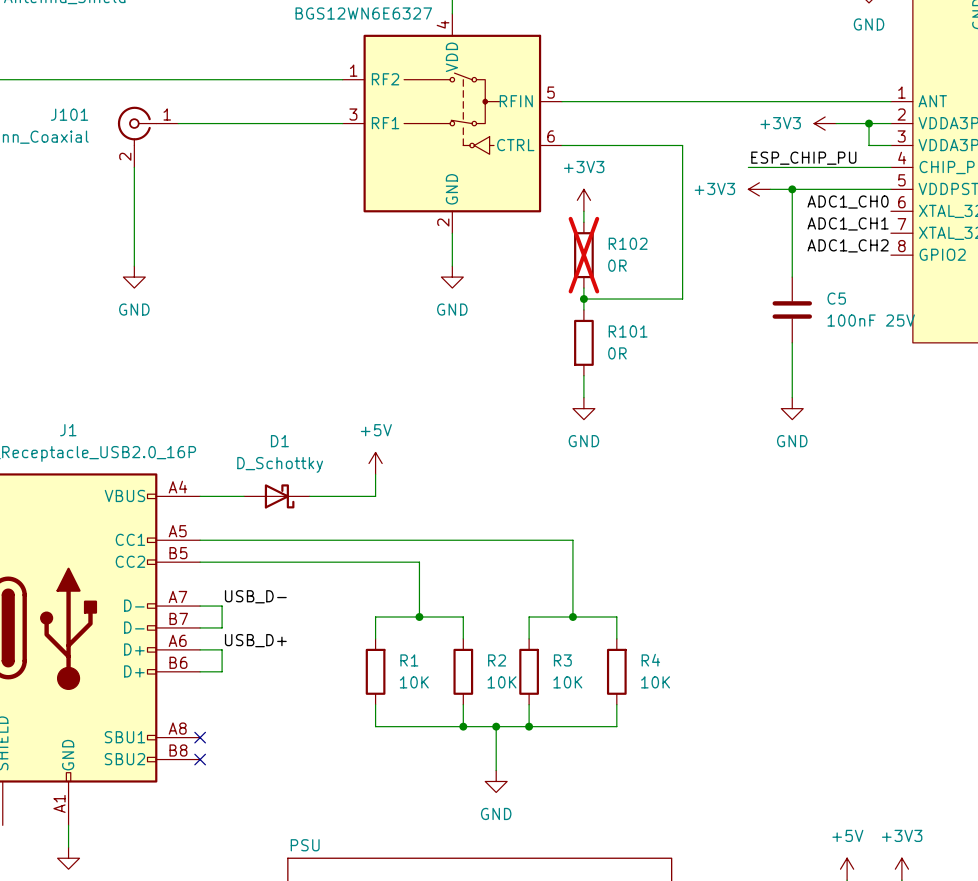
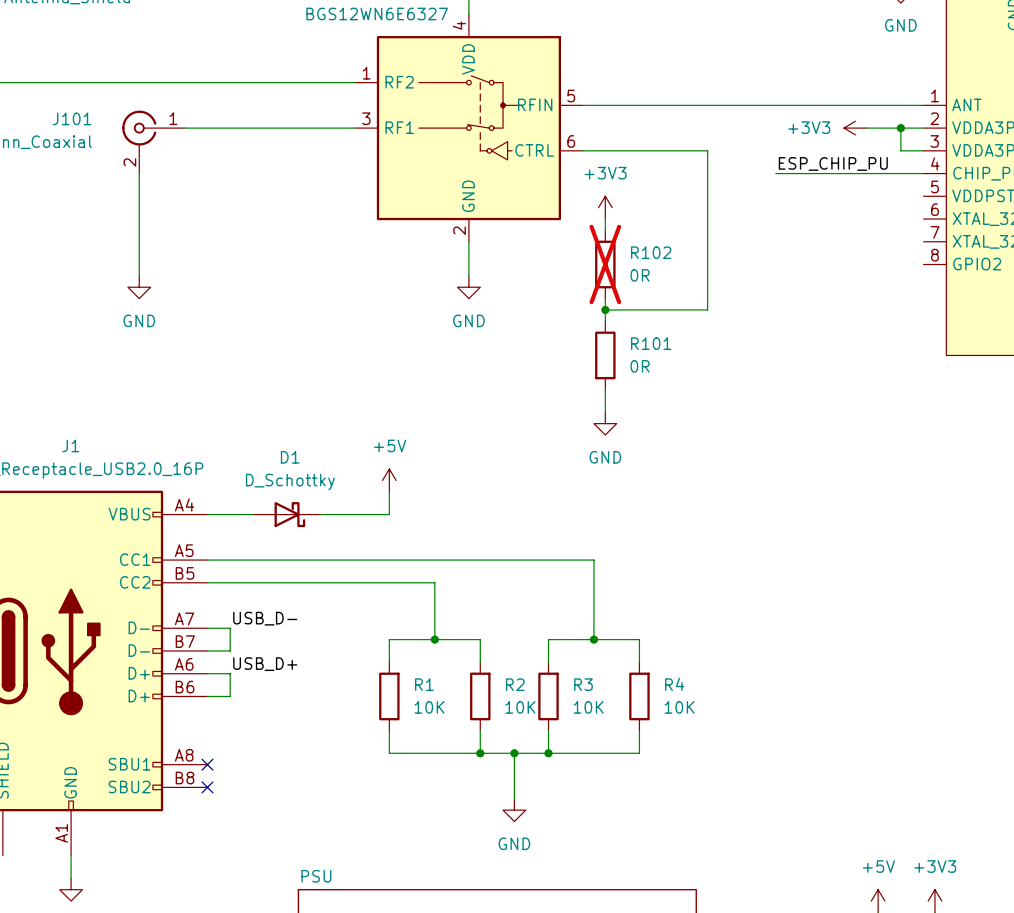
power symbol: +3V3 (759, 189) -> none
wire: (770, 189) (890, 189) -> none
wire: (792, 189) (792, 277) -> none
junction: (792, 189) -> none
label: ADC1_CH0 (848, 202) -> none
label: ADC1_CH1 (848, 223) -> none
label: ADC1_CH2 (848, 245) -> none
C5: 100nF 25V (792, 309) -> none
wire: (792, 342) (792, 397) -> none
power symbol: GND (792, 408) -> none

